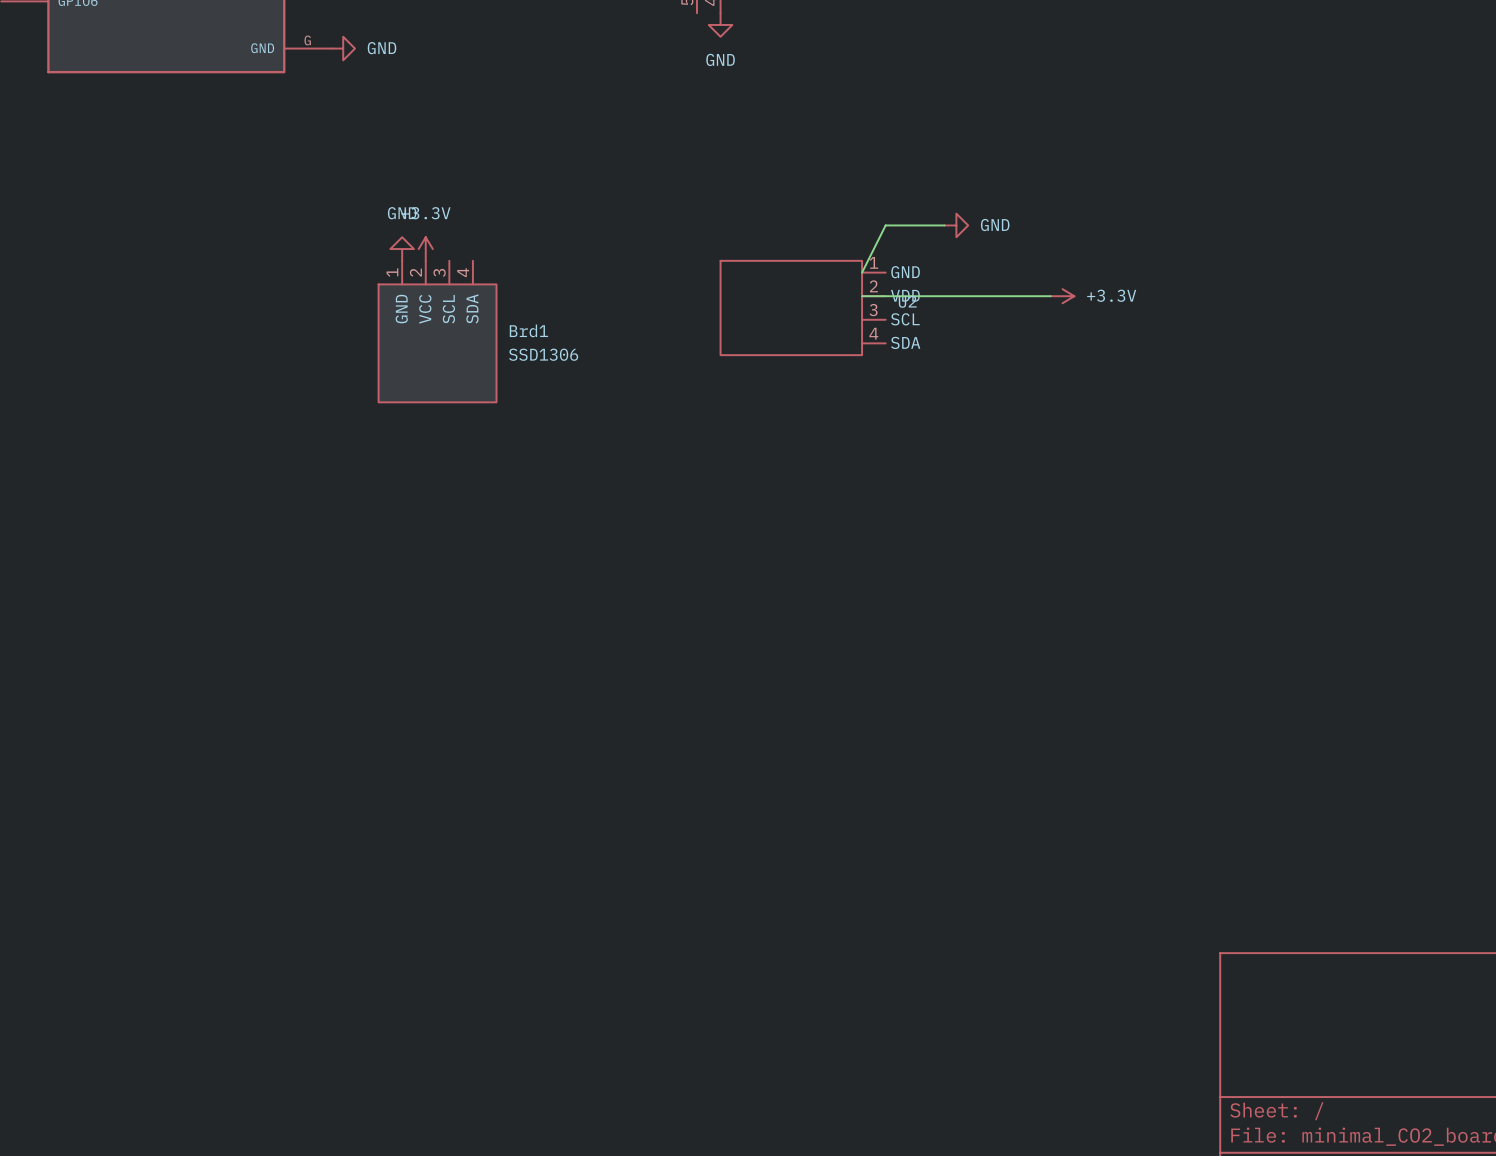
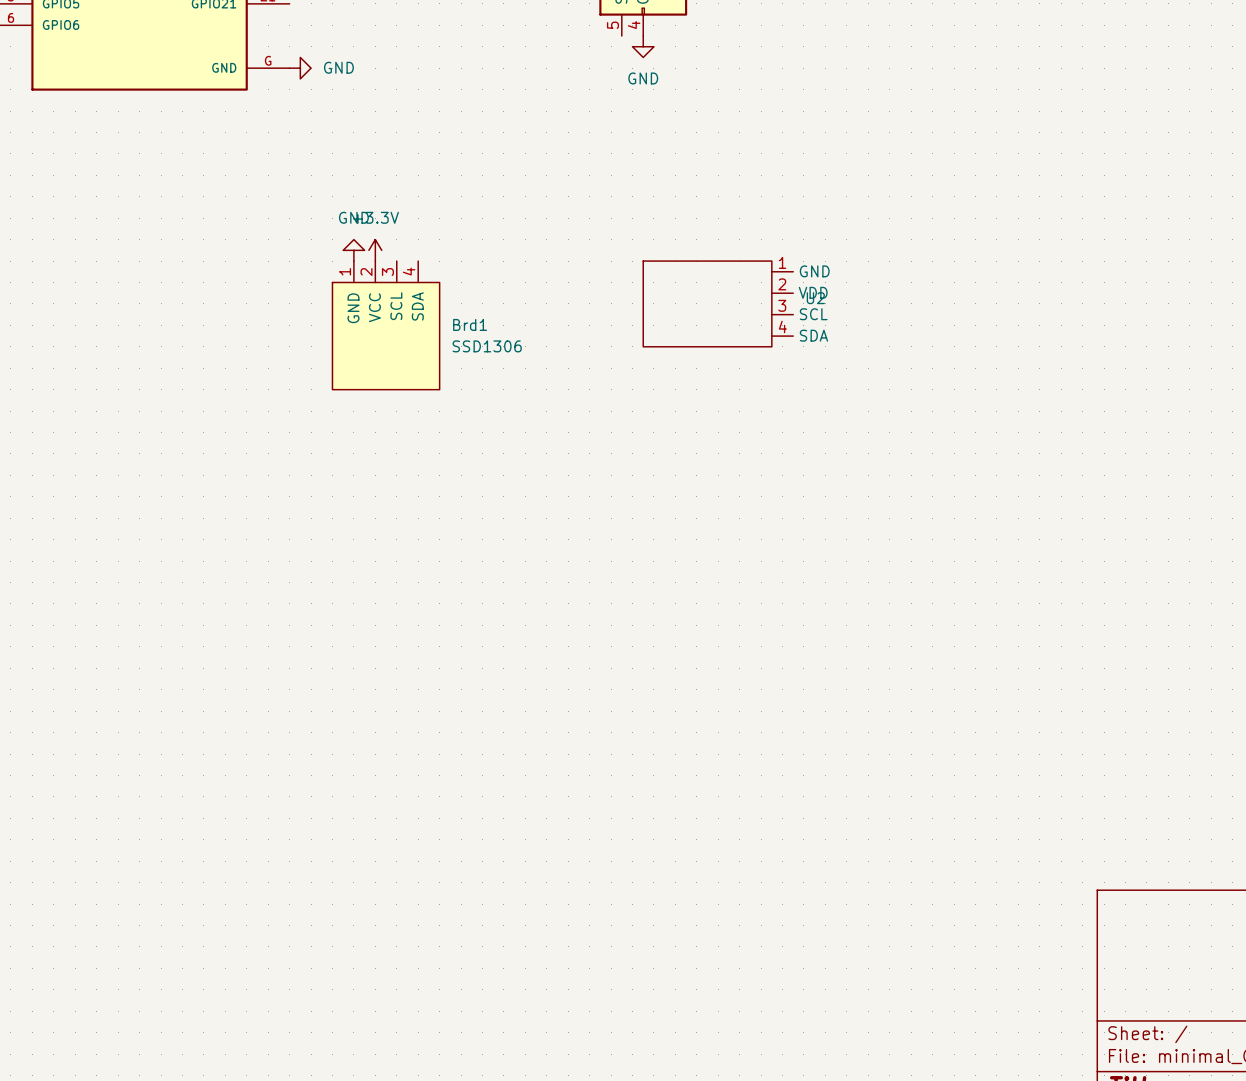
wire: (944, 225) (885, 225) (862, 272) -> none
power symbol: GND (956, 225) -> none
wire: (862, 296) (1050, 296) -> none
power symbol: +3.3V (1062, 296) -> none

